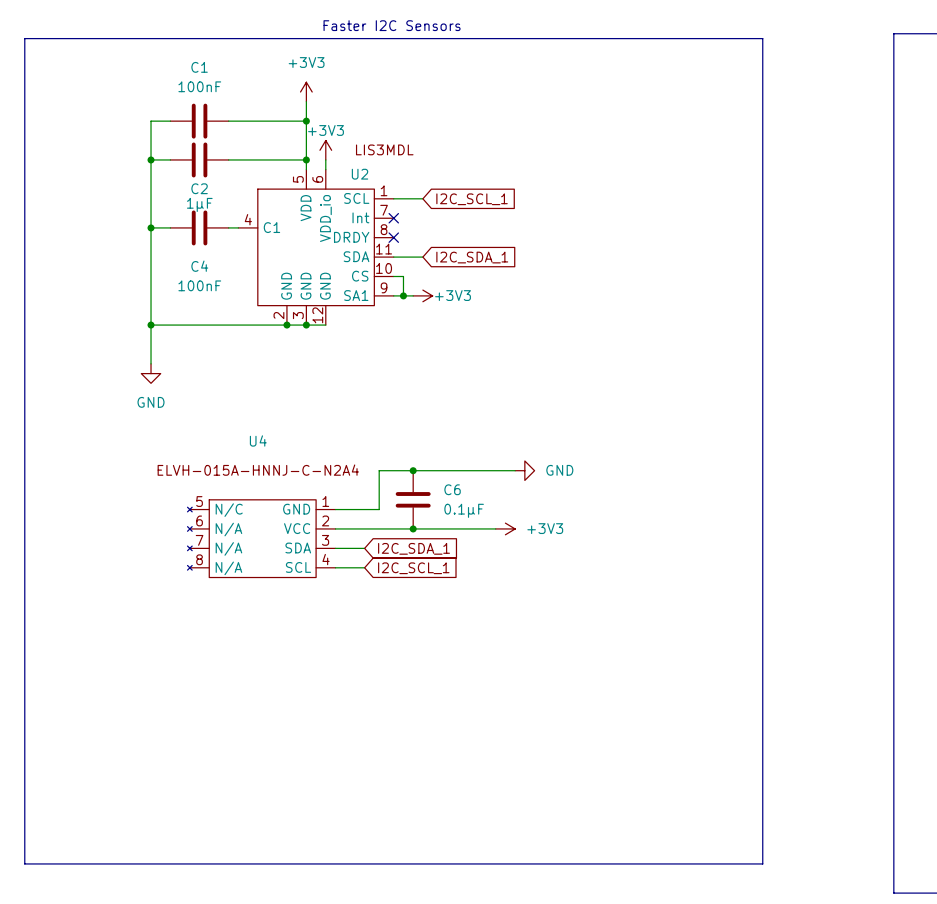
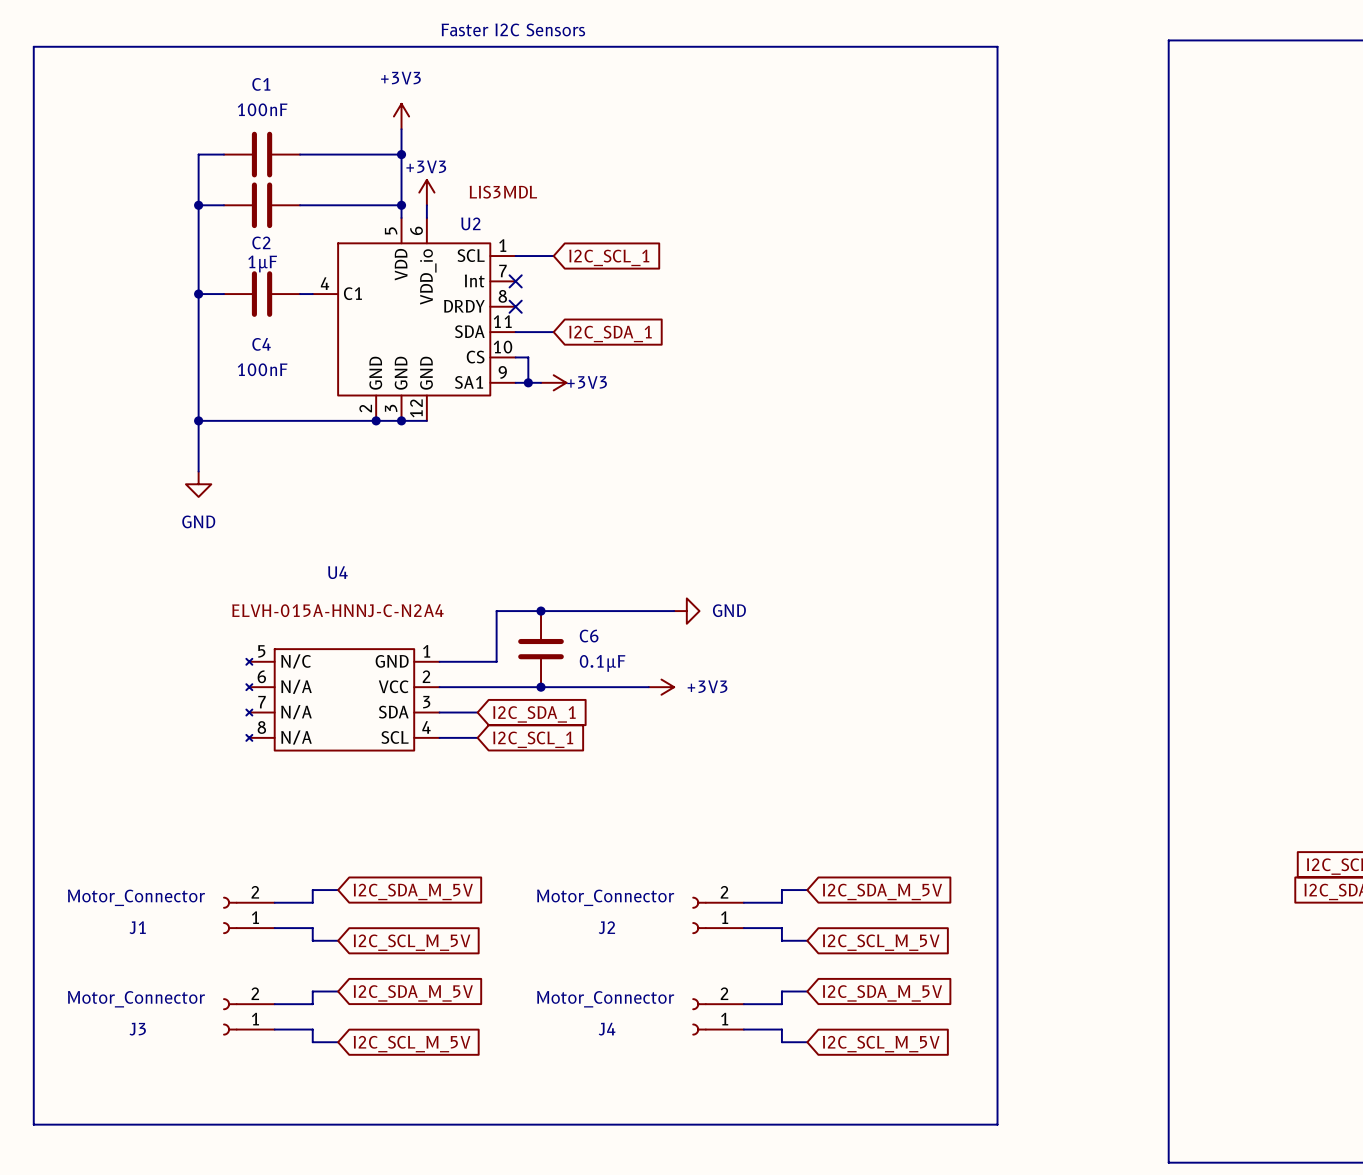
wire: none -> (338, 890) (312, 890) (312, 902) (274, 902)
global label: none -> I2C_SDA_M_5V (413, 891)
wire: none -> (807, 890) (781, 890) (781, 902) (743, 902)
global label: none -> I2C_SDA_M_5V (882, 891)
J1: none -> Motor_Connector (248, 915)
J2: none -> Motor_Connector (718, 915)
wire: none -> (274, 928) (312, 928) (312, 940) (338, 940)
wire: none -> (743, 928) (781, 928) (781, 940) (807, 940)
global label: none -> I2C_SCL_M_5V (412, 942)
global label: none -> I2C_SCL_M_5V (881, 942)
wire: none -> (338, 991) (312, 991) (312, 1004) (274, 1004)
global label: none -> I2C_SDA_M_5V (413, 993)
wire: none -> (807, 991) (781, 991) (781, 1004) (743, 1004)
global label: none -> I2C_SDA_M_5V (882, 993)
J3: none -> Motor_Connector (248, 1016)
J4: none -> Motor_Connector (718, 1016)
wire: none -> (274, 1029) (312, 1029) (312, 1042) (338, 1042)
wire: none -> (743, 1029) (781, 1029) (781, 1042) (807, 1042)
global label: none -> I2C_SCL_M_5V (412, 1044)
global label: none -> I2C_SCL_M_5V (881, 1044)

